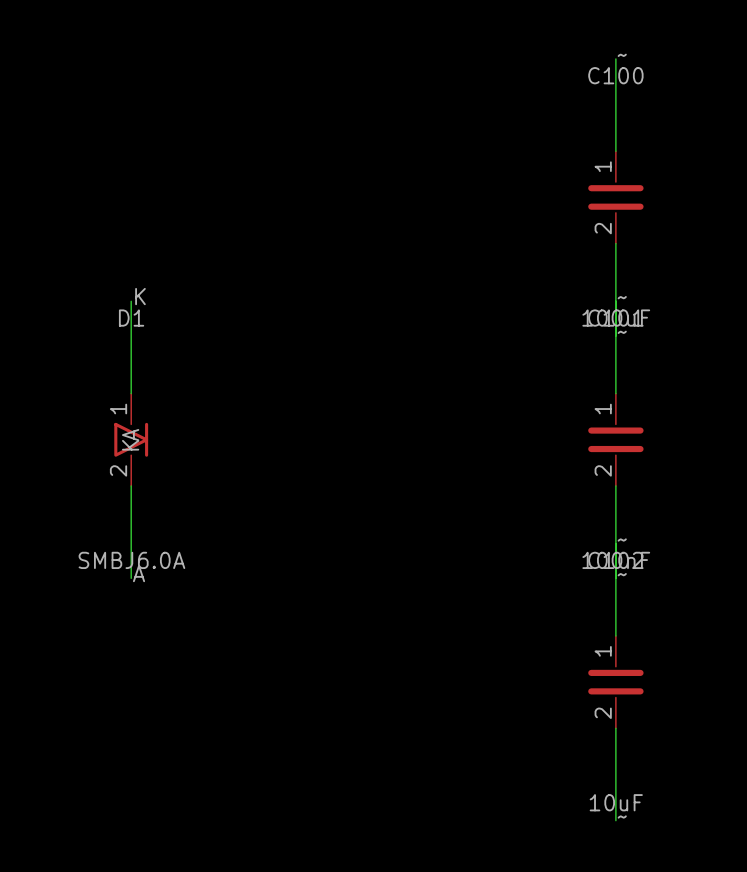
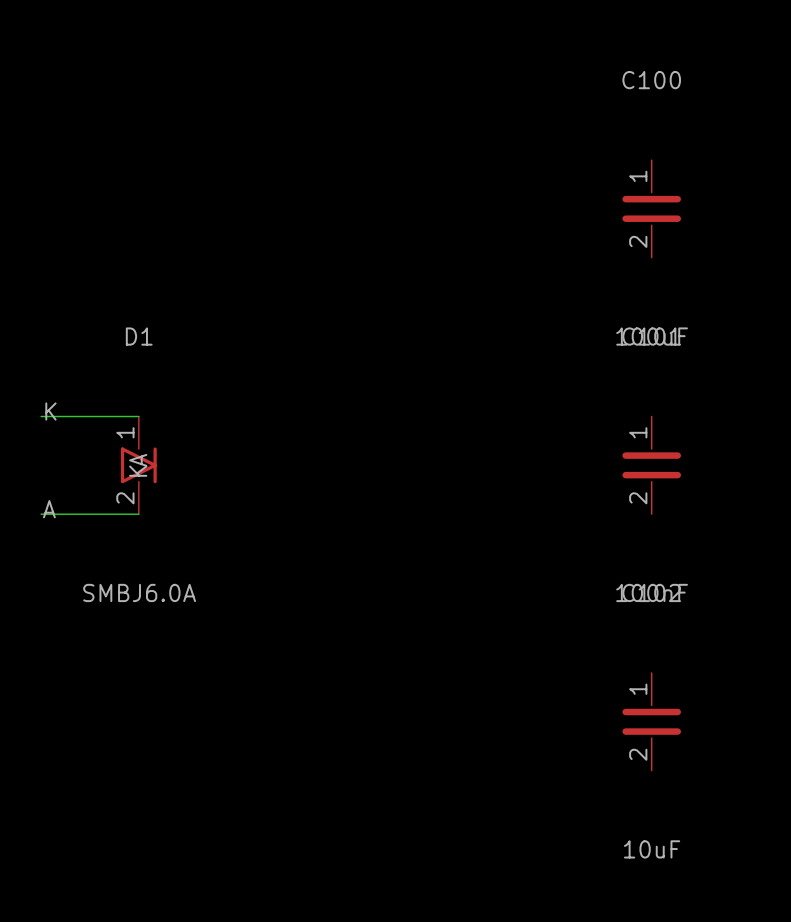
label: ~ (622, 55) -> none
wire: (615, 58) (615, 151) -> none
wire: (615, 243) (615, 393) -> none
label position: K (140, 296) -> K (50, 411)
label: ~ (622, 297) -> none
wire: (131, 301) (131, 393) -> (41, 416) (138, 416)
label: ~ (622, 332) -> none
wire: (131, 485) (131, 578) -> (138, 514) (41, 514)
wire: (615, 485) (615, 635) -> none
label: ~ (622, 540) -> none
label position: A (139, 573) -> A (49, 509)
label: ~ (622, 574) -> none
wire: (615, 728) (615, 820) -> none
label: ~ (622, 817) -> none

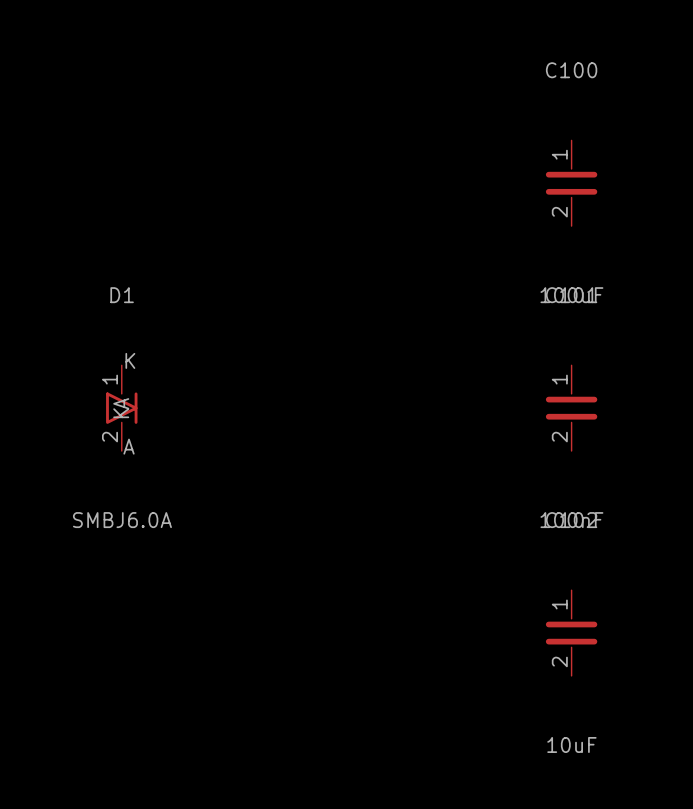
label position: K (50, 411) -> K (130, 360)
wire: (41, 416) (138, 416) -> none
label position: A (49, 509) -> A (129, 446)
wire: (41, 514) (138, 514) -> none

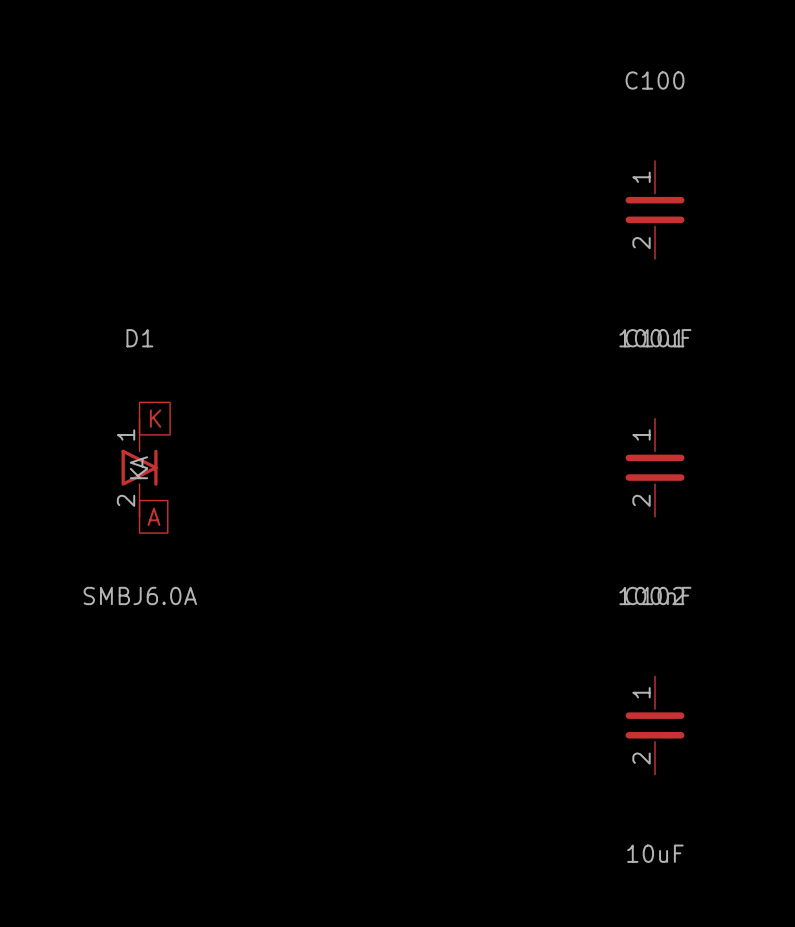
label: K (130, 360) -> none
global label: none -> K (155, 418)
label: A (129, 446) -> none
global label: none -> A (153, 516)

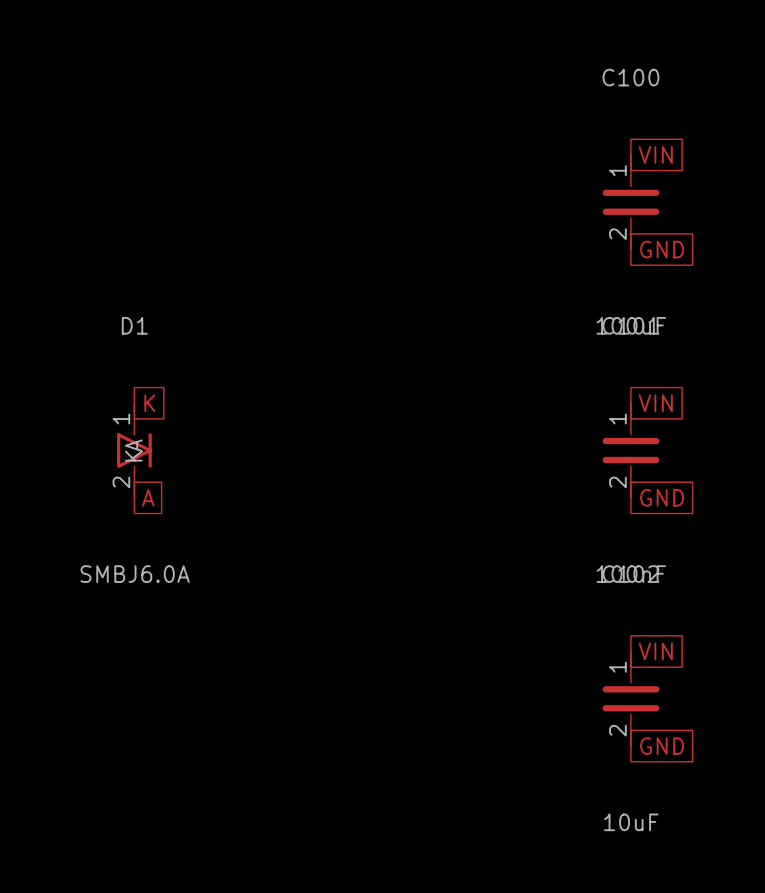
global label: none -> VIN (655, 154)
global label: none -> GND (662, 249)
global label: none -> VIN (655, 403)
global label: none -> GND (662, 497)
global label: none -> VIN (655, 651)
global label: none -> GND (662, 746)

